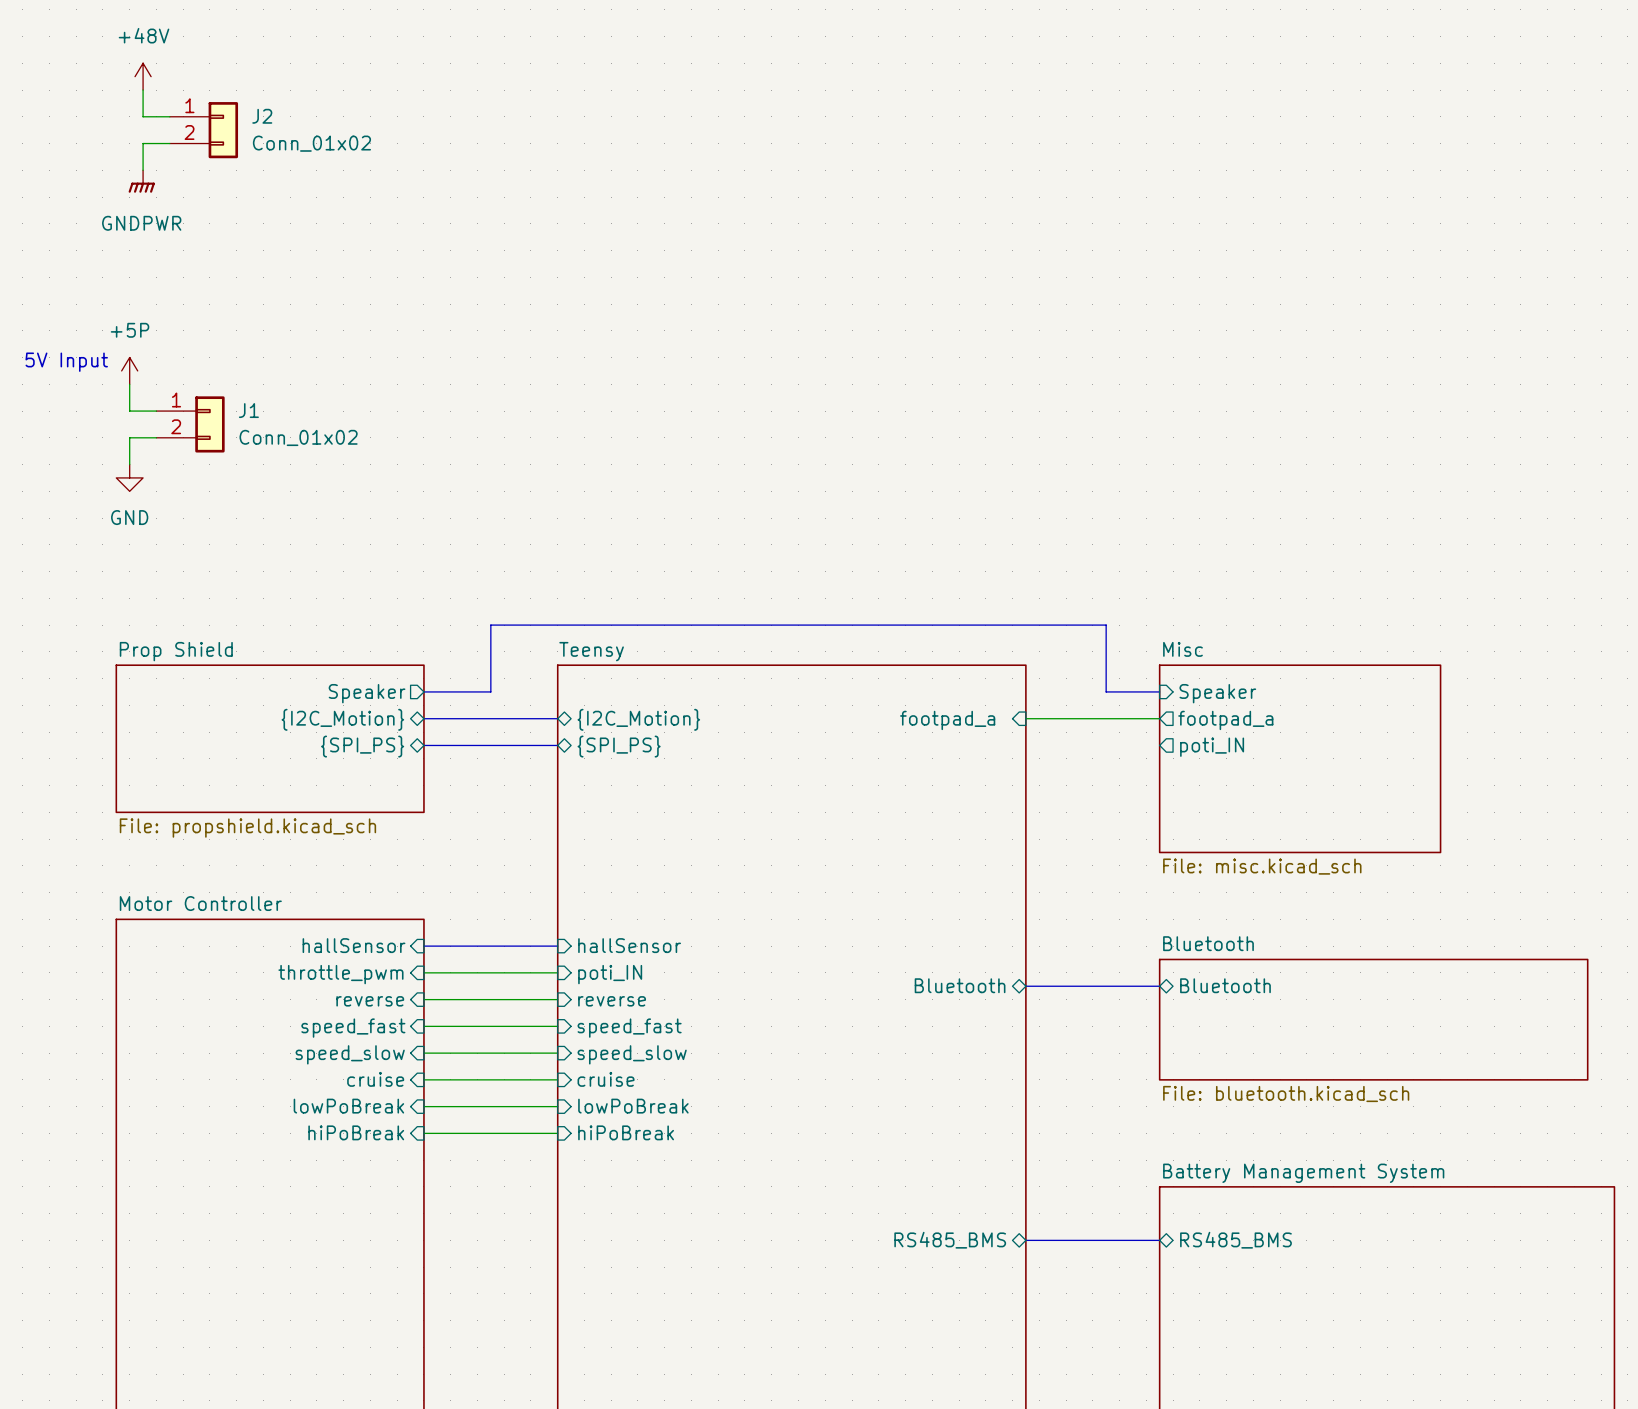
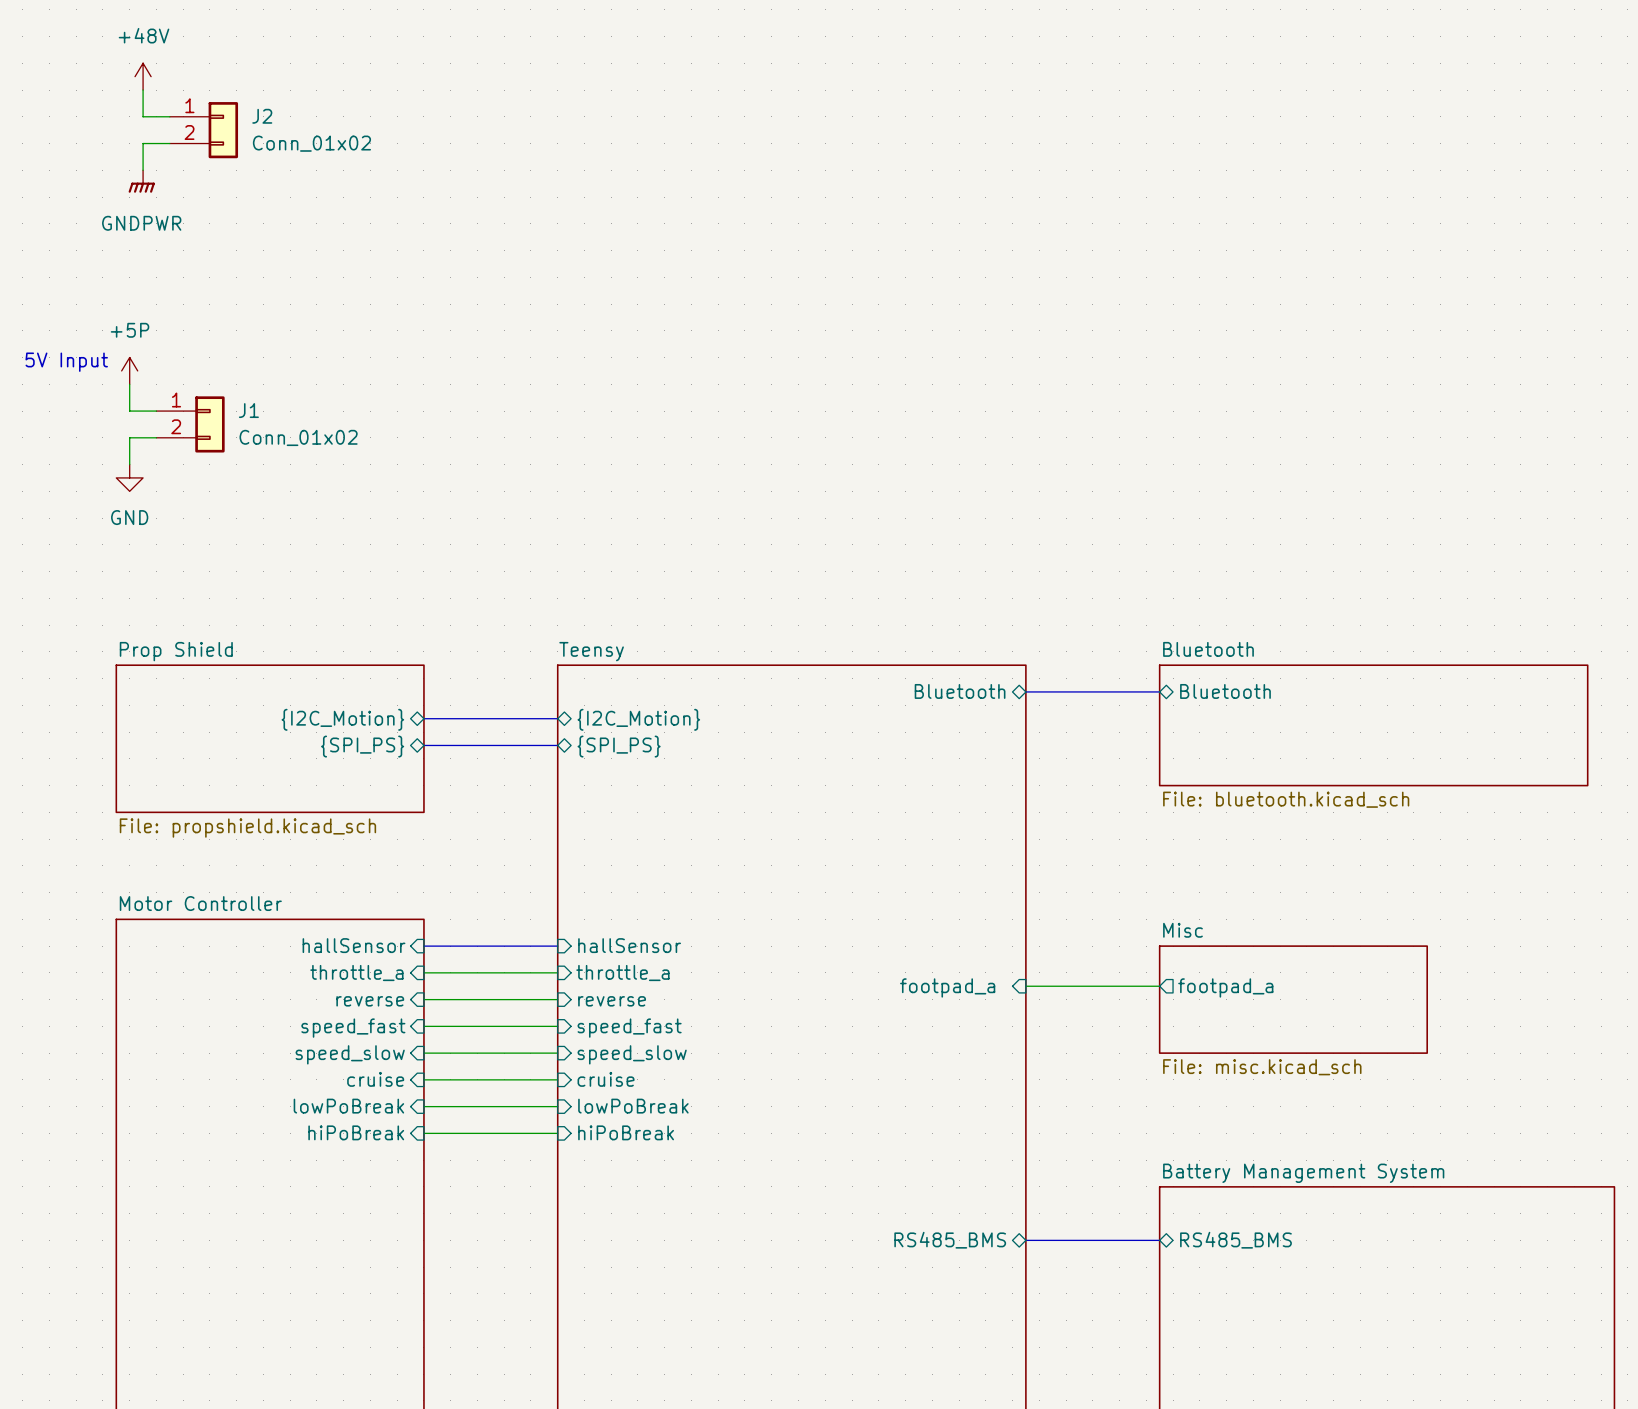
bus: (423, 691) (490, 691) (490, 625) (1106, 625) (1106, 691) -> (1025, 691) (1106, 691)
sheet pin: none -> Bluetooth (960, 691)
sheet pin: Speaker (367, 693) -> none
sheet pin shape: input (1217, 693) -> bidirectional (1225, 691)
sheet pin: Speaker (1217, 693) -> Bluetooth (1225, 691)
wire: (1025, 718) (1159, 718) -> none
sheet pin: footpad_a (947, 720) -> none
sheet pin: footpad_a (1225, 720) -> none
sheet Bluetooth: none -> File: bluetooth.kicad_sch (1373, 725)
sheet pin: poti_IN (1212, 747) -> none
sheet Misc: File: misc.kicad_sch (1300, 758) -> none
sheet pin: throttle_pwm (340, 974) -> throttle_a (356, 972)
sheet pin: poti_IN (610, 974) -> throttle_a (622, 972)
sheet pin shape: bidirectional (960, 985) -> input (947, 987)
sheet pin: Bluetooth (960, 985) -> footpad_a (947, 987)
sheet pin shape: bidirectional (1225, 985) -> output (1225, 987)
sheet pin: Bluetooth (1225, 985) -> footpad_a (1225, 987)
bus: (1025, 986) (1159, 986) -> none
sheet Misc: none -> File: misc.kicad_sch (1293, 999)
sheet Bluetooth: File: bluetooth.kicad_sch (1373, 1019) -> none

